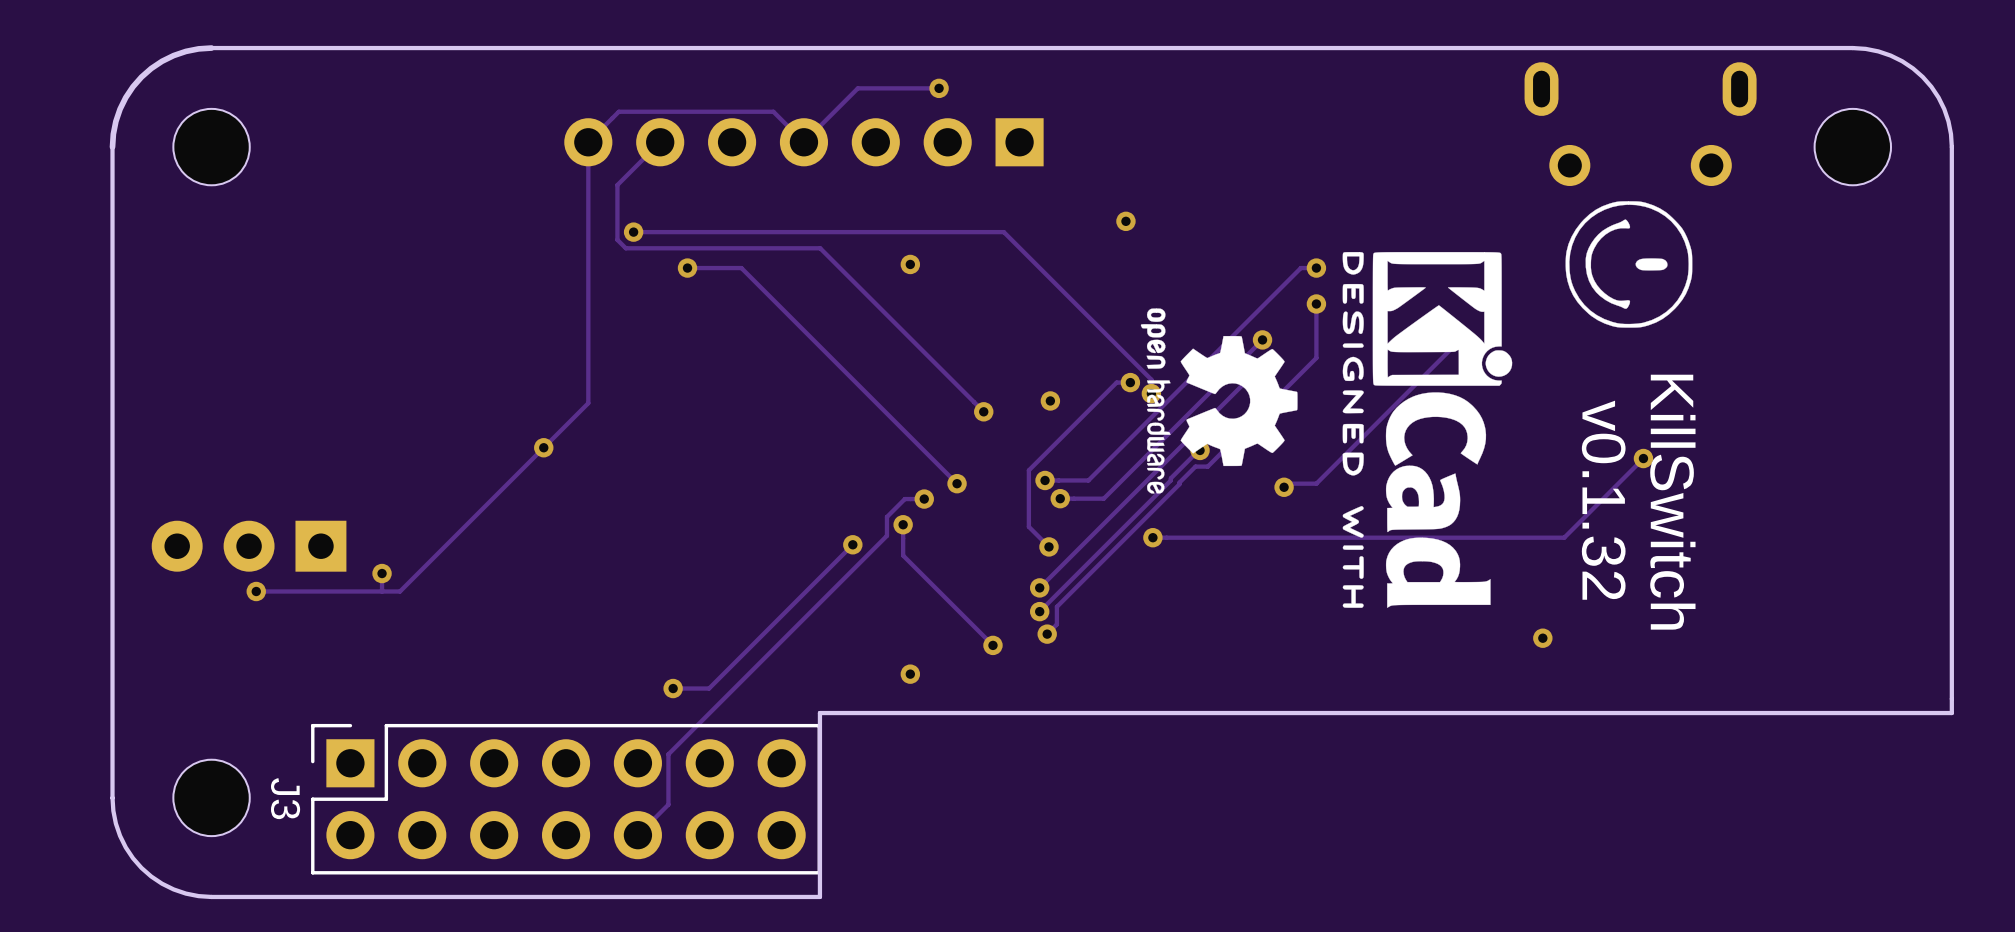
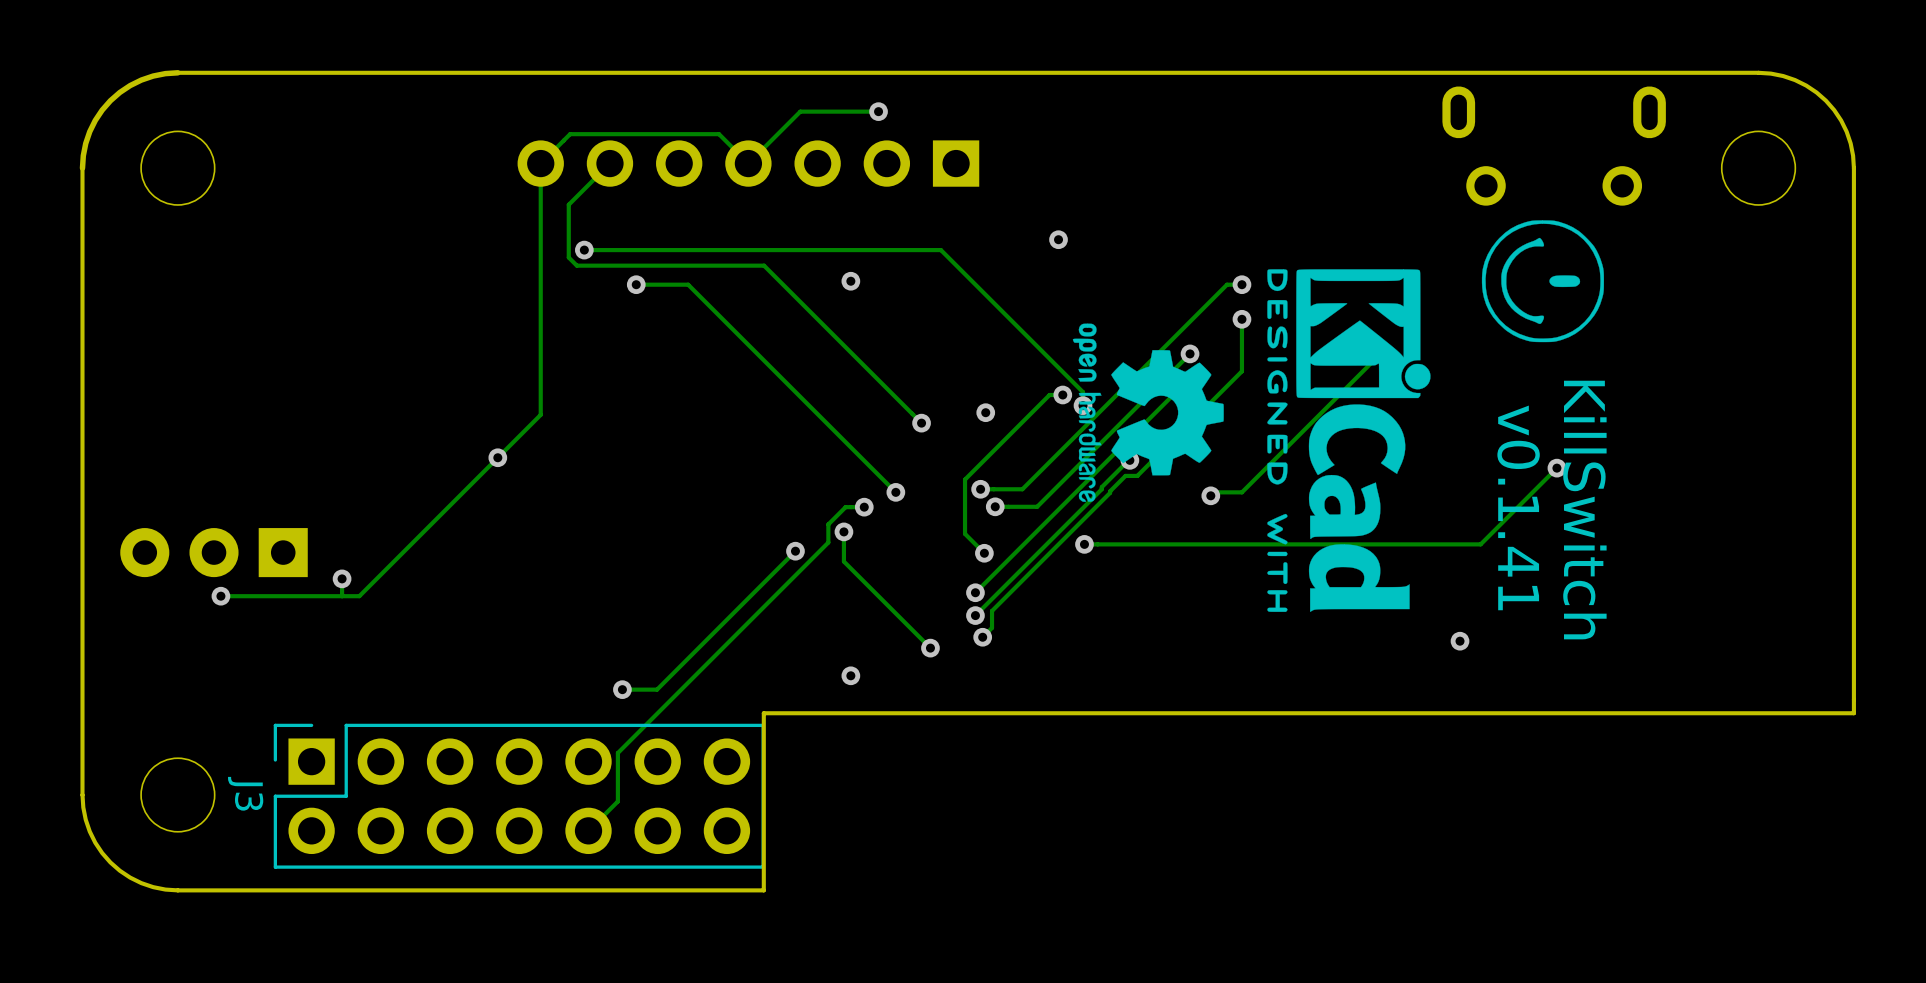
text: v0.1.32 (1603, 500) -> v0.1.41 (1518, 507)

